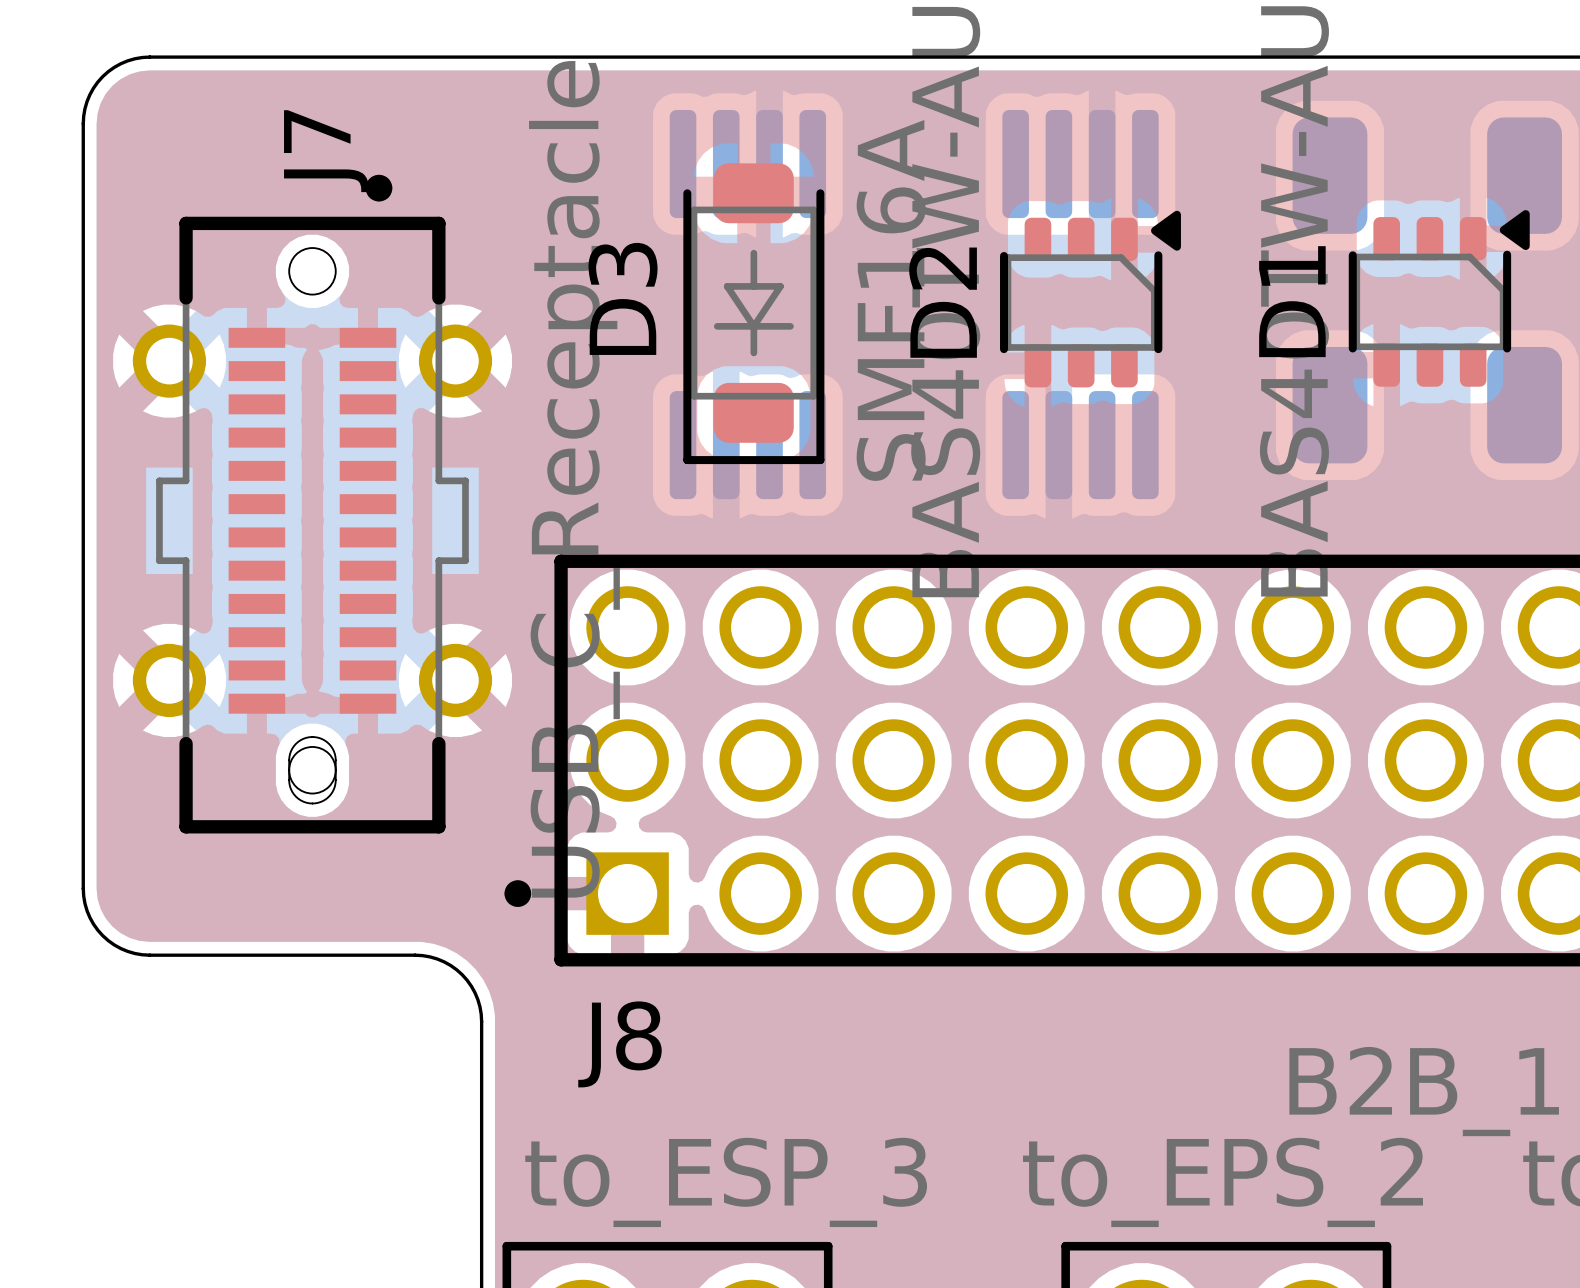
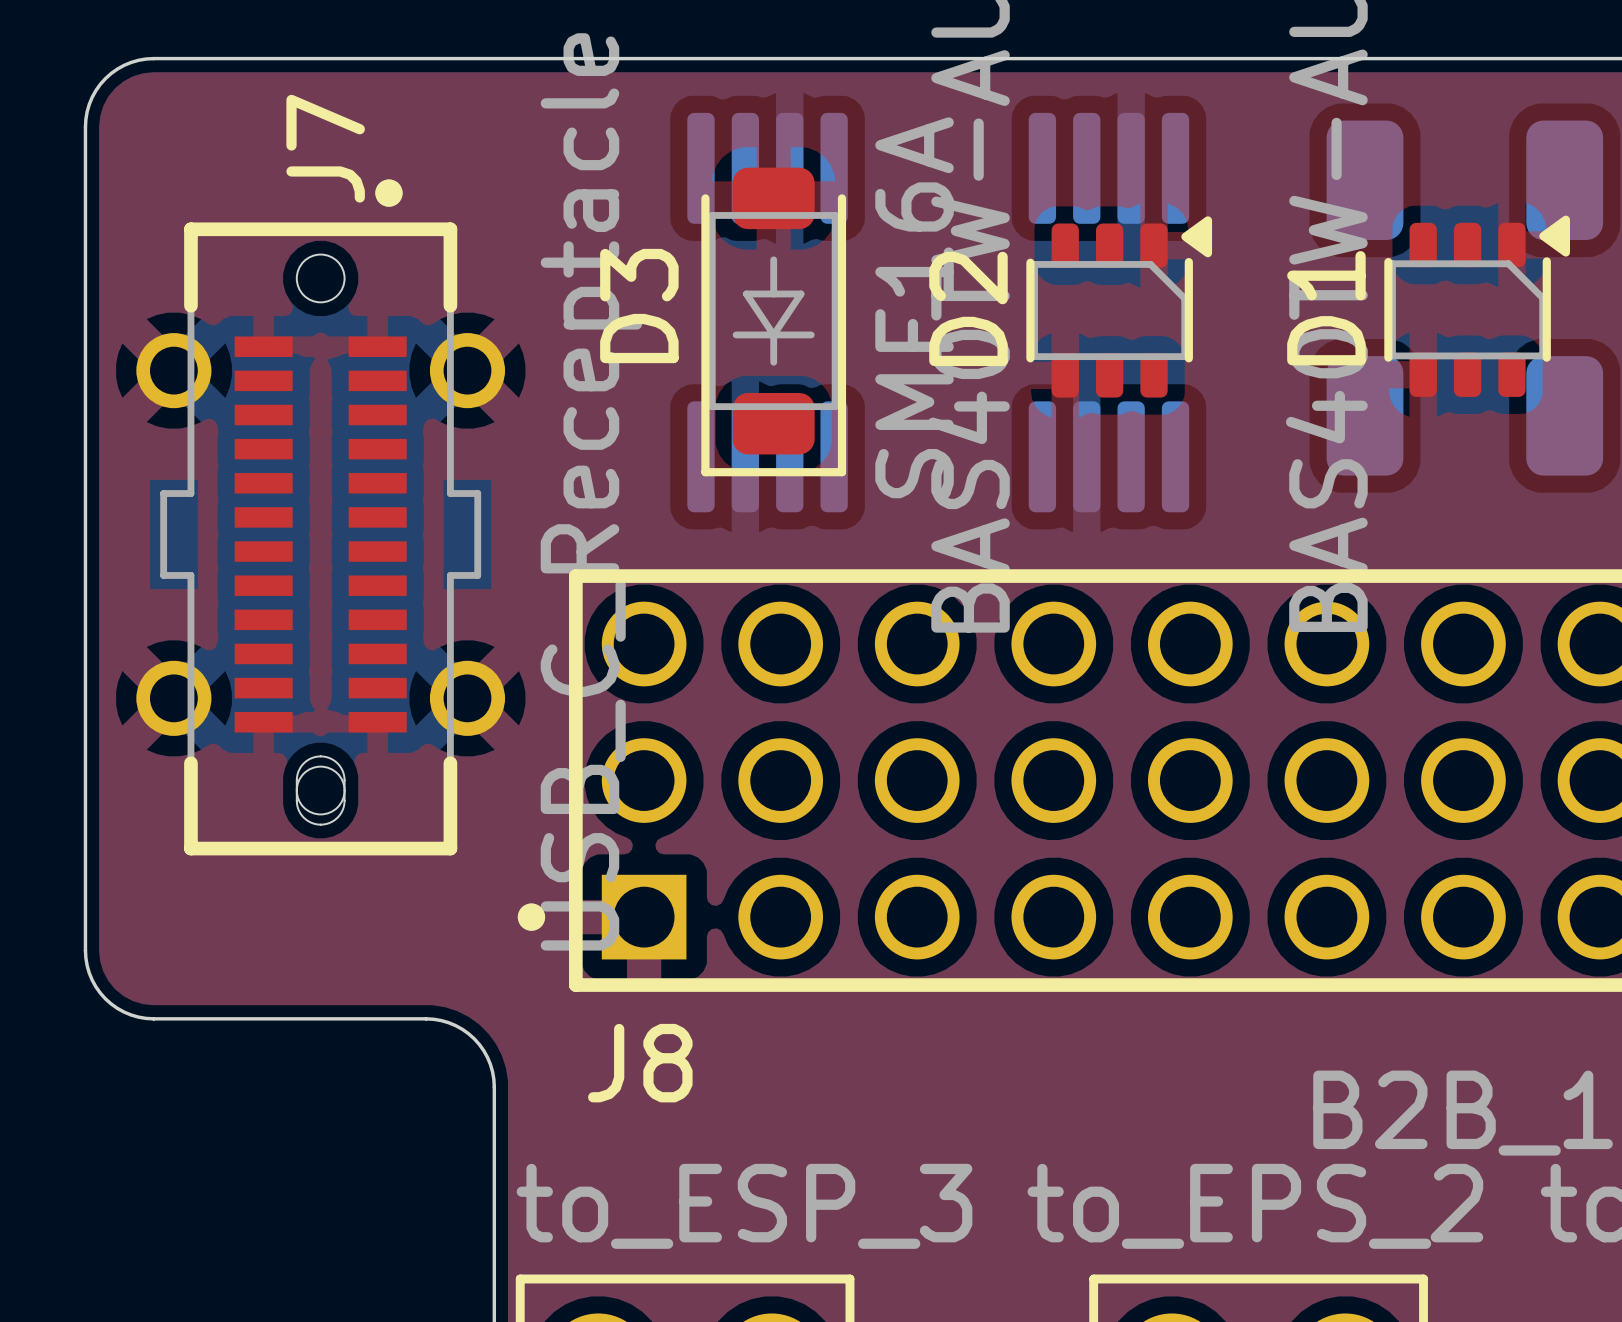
board edge: (83, 888) (87, 910) (97, 930) (114, 945) (135, 953) (149, 955) (415, 955) (429, 956) (443, 961) (456, 969) (467, 980) (477, 999) (481, 1014) (481, 1059) -> (85, 912) (85, 958) (89, 973) (95, 986) (105, 998) (124, 1012) (138, 1017) (153, 1018) (426, 1018) (441, 1020) (462, 1029) (479, 1044) (490, 1064) (494, 1087)

